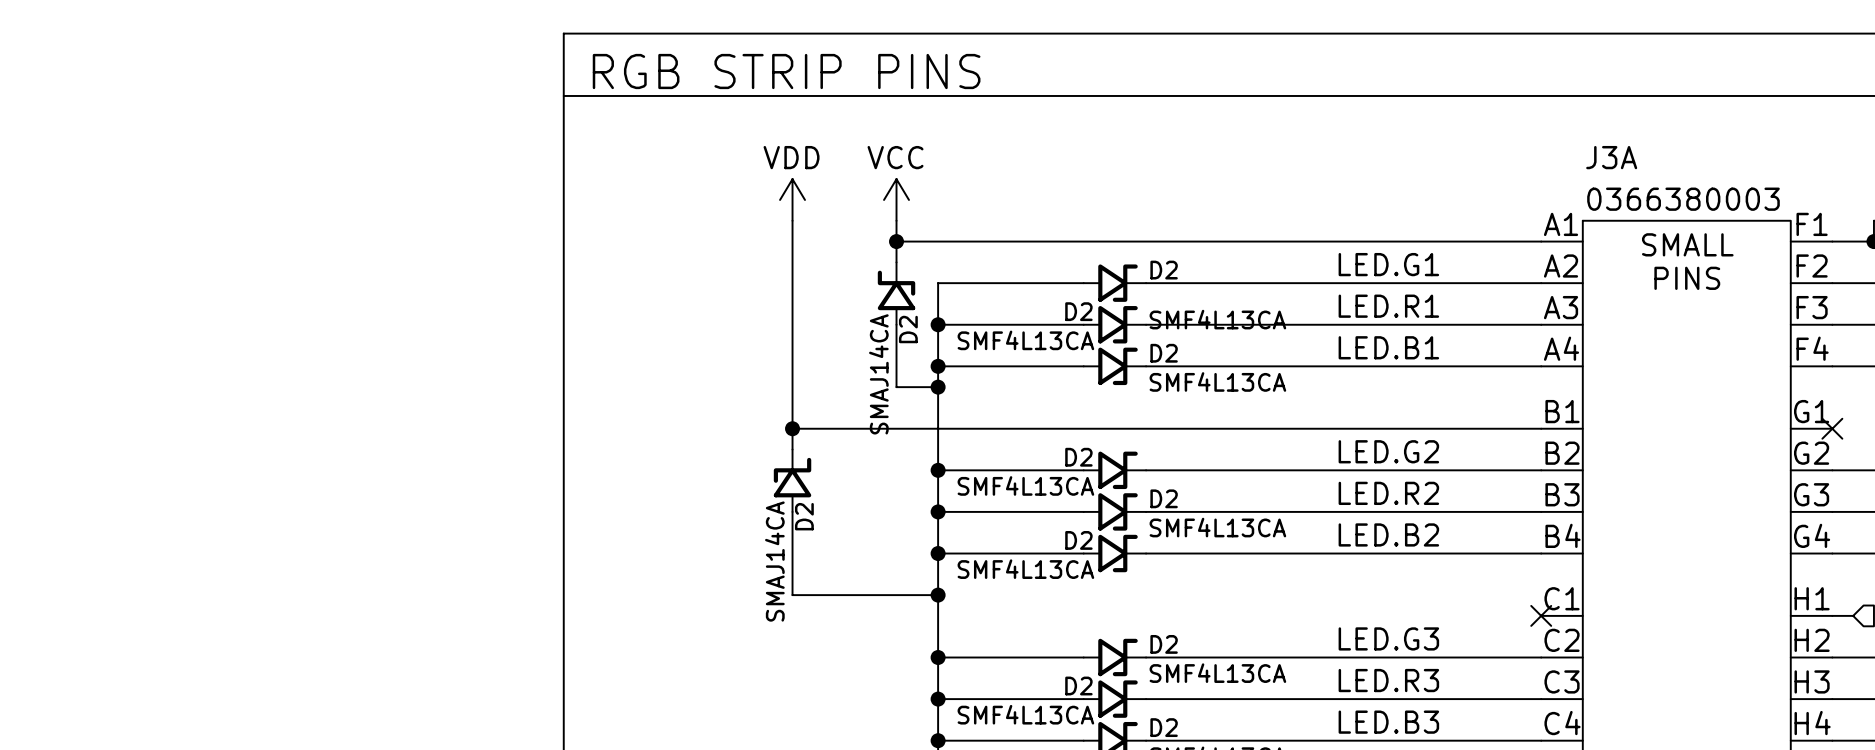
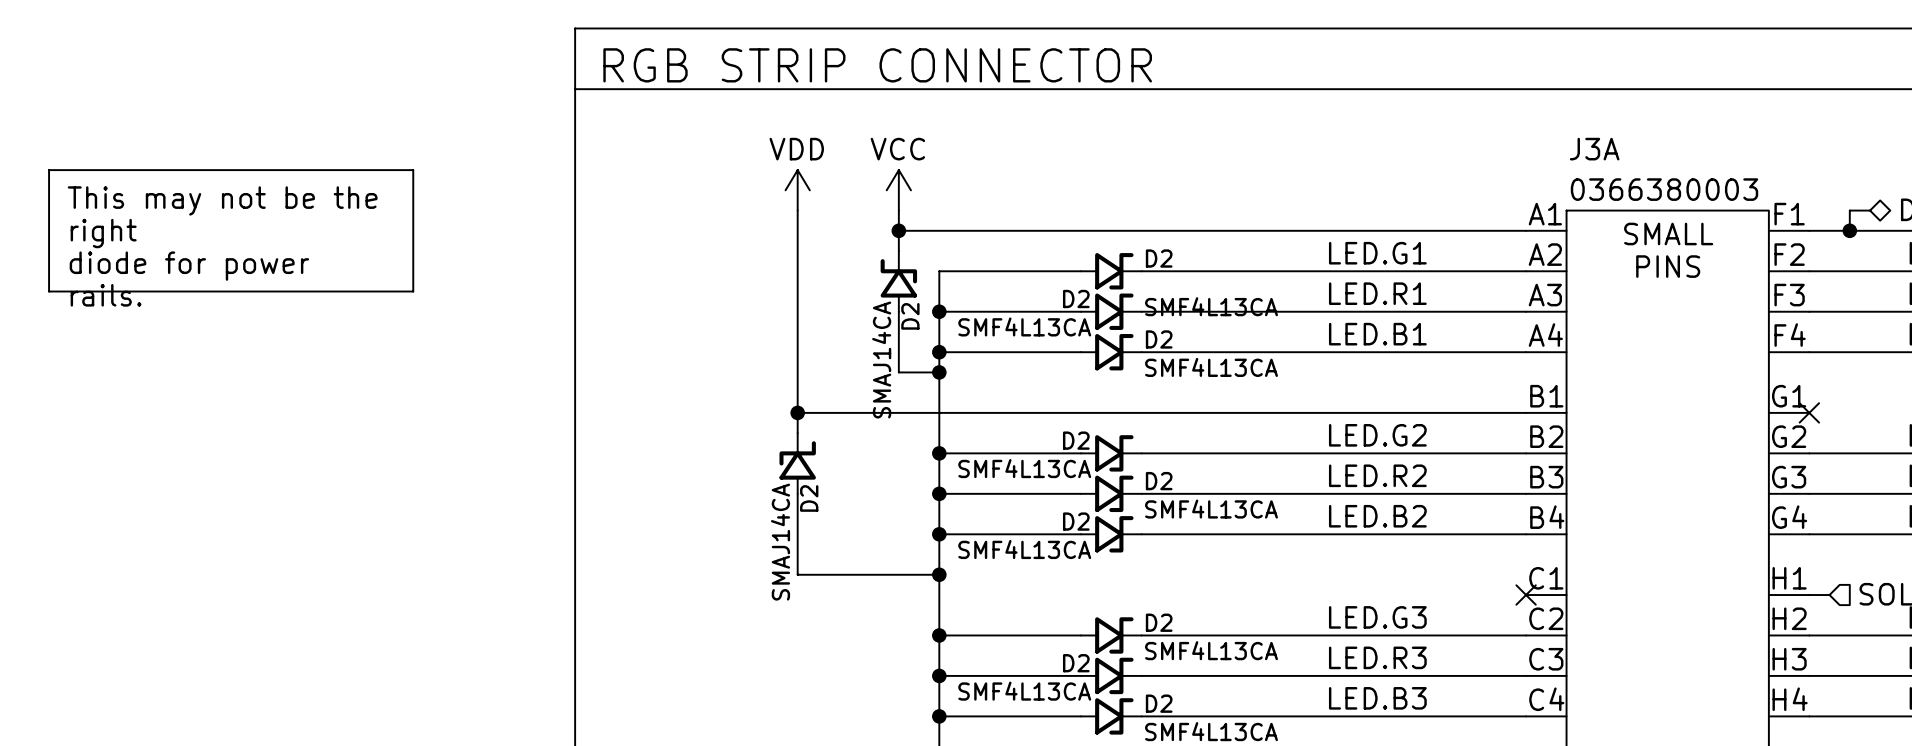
text: RGB STRIP PINS (786, 71) -> RGB STRIP CONNECTOR (877, 65)
line: none -> (49, 170) (413, 170) (413, 291) (49, 291) (49, 170)
text: none -> This may not be the (222, 200)
text: none -> right (103, 233)
text: none -> diode for power (189, 266)
text: none -> rails. (106, 295)

